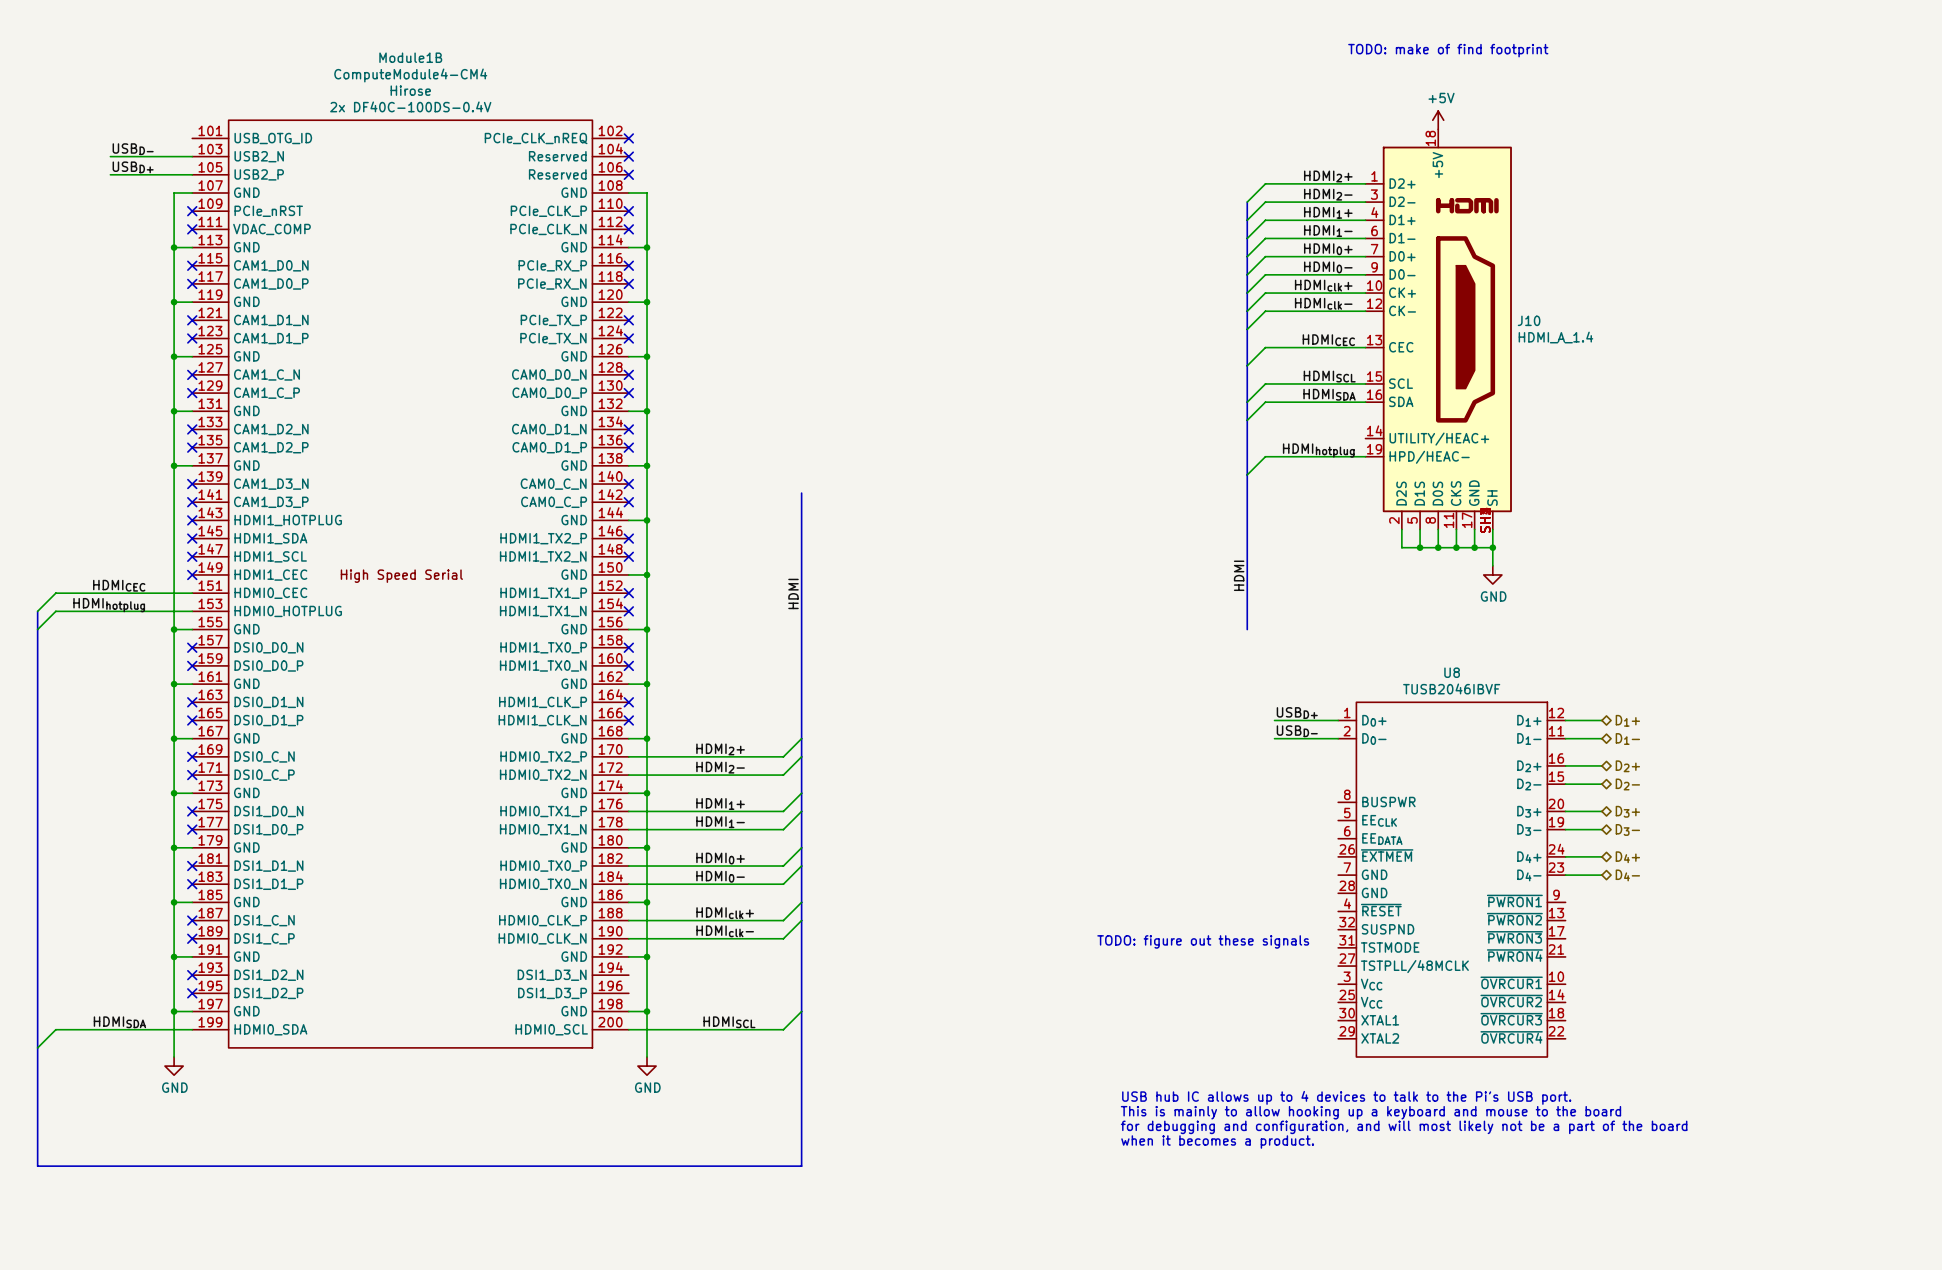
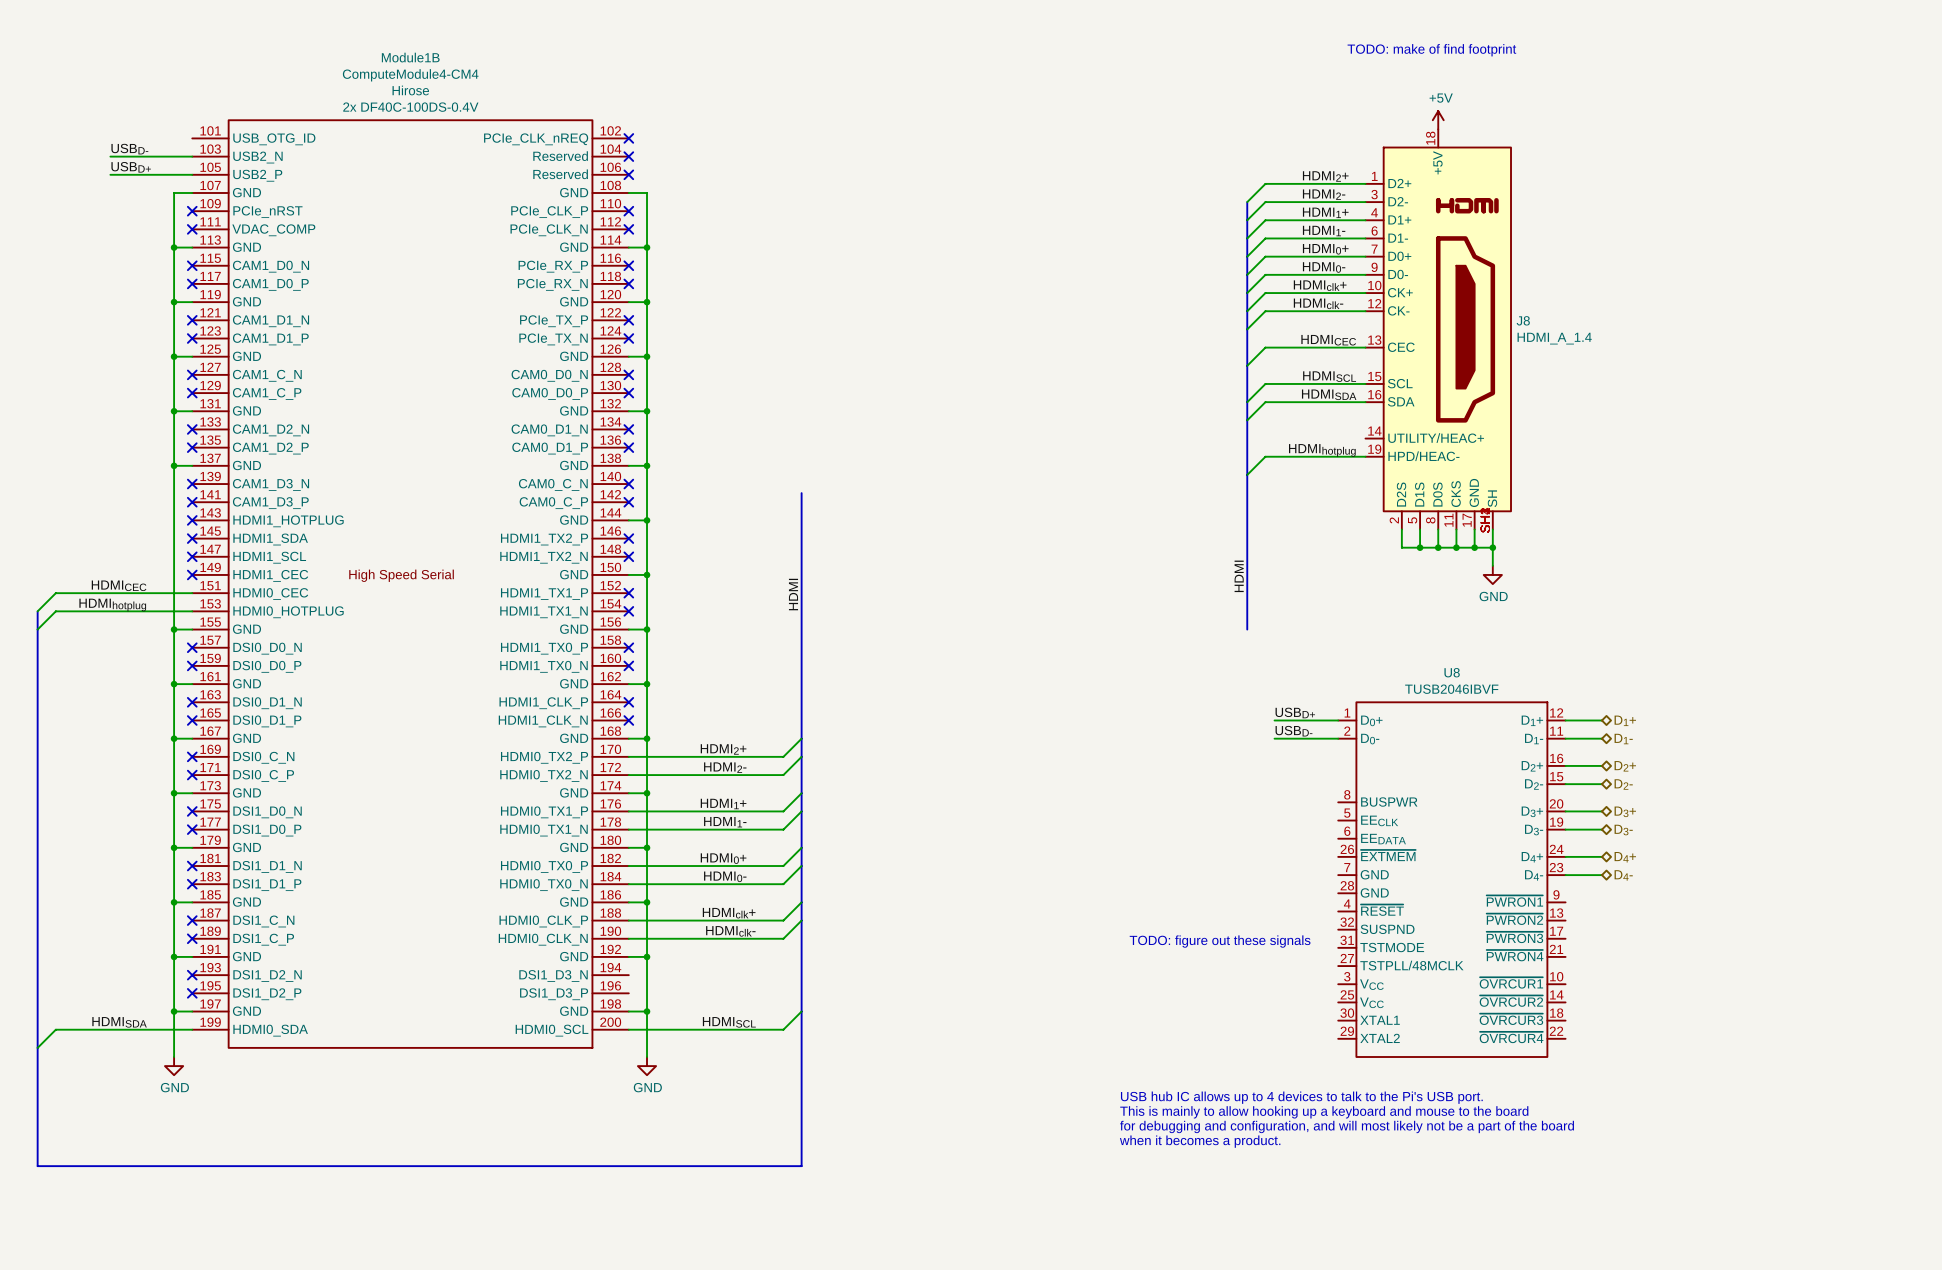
J10 name: J10 (1529, 320) -> J8 (1523, 320)

